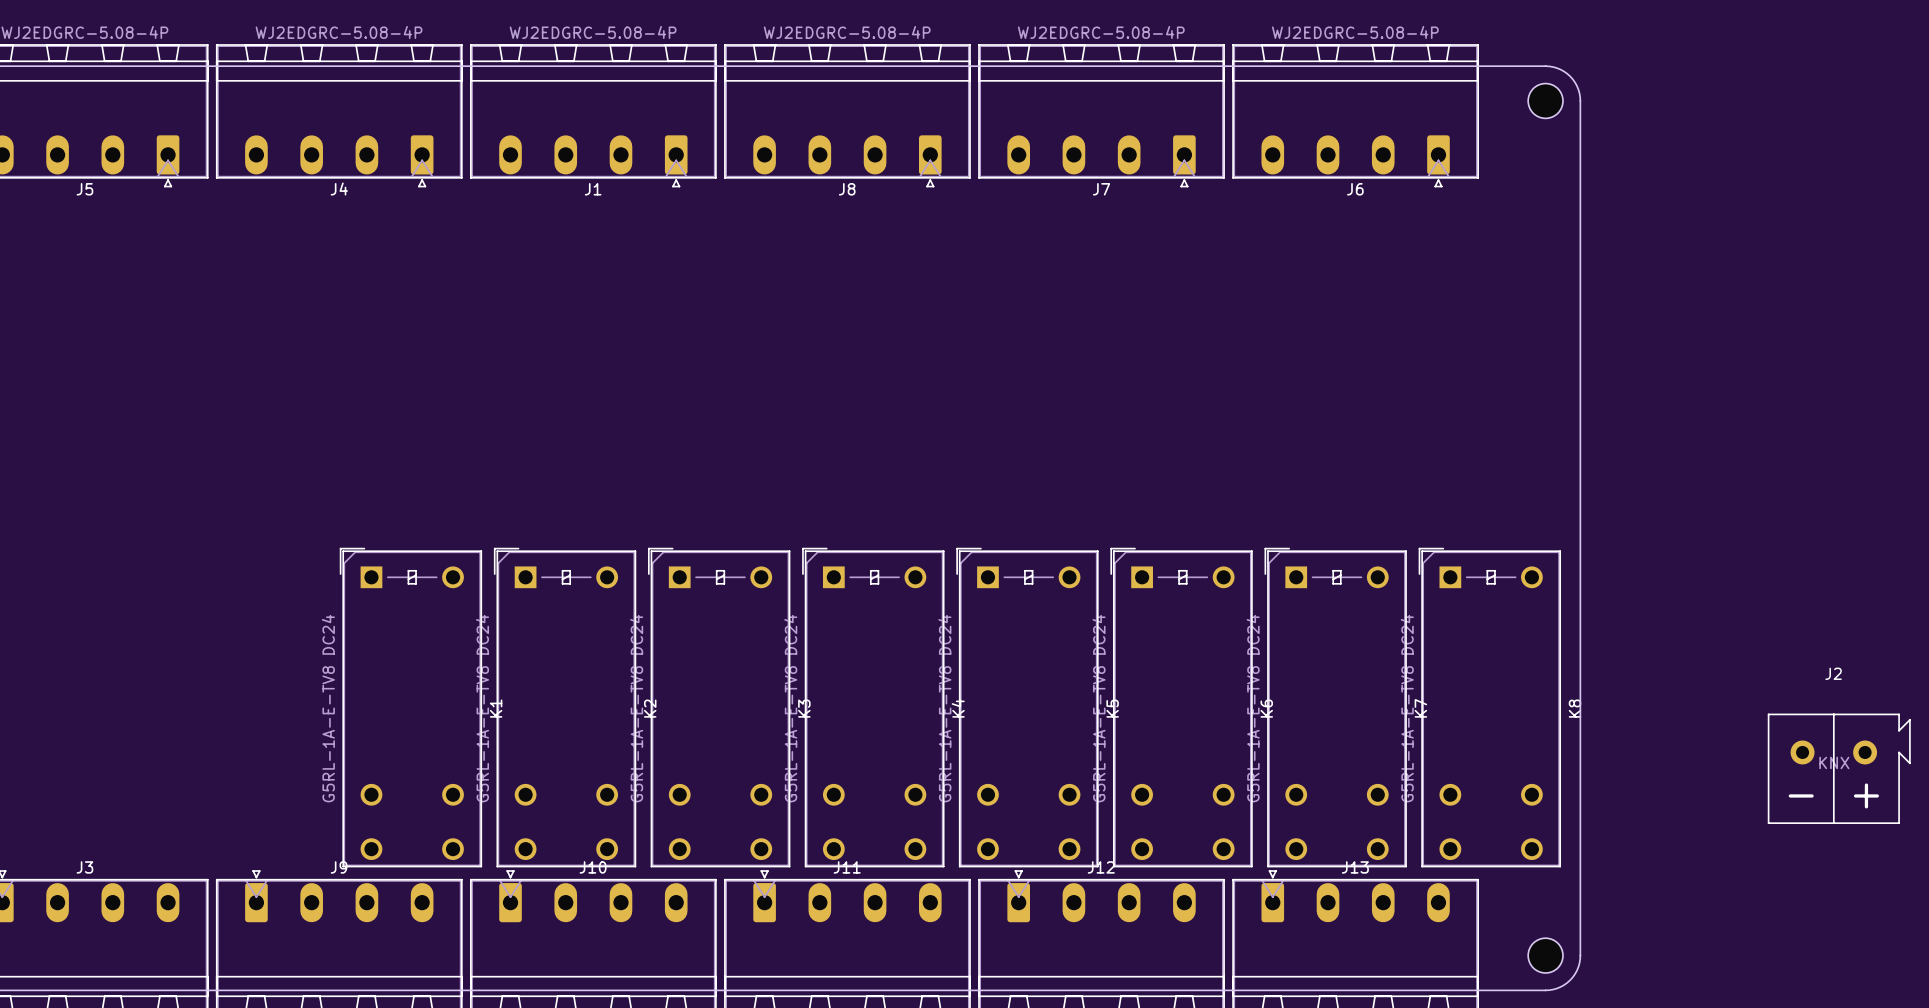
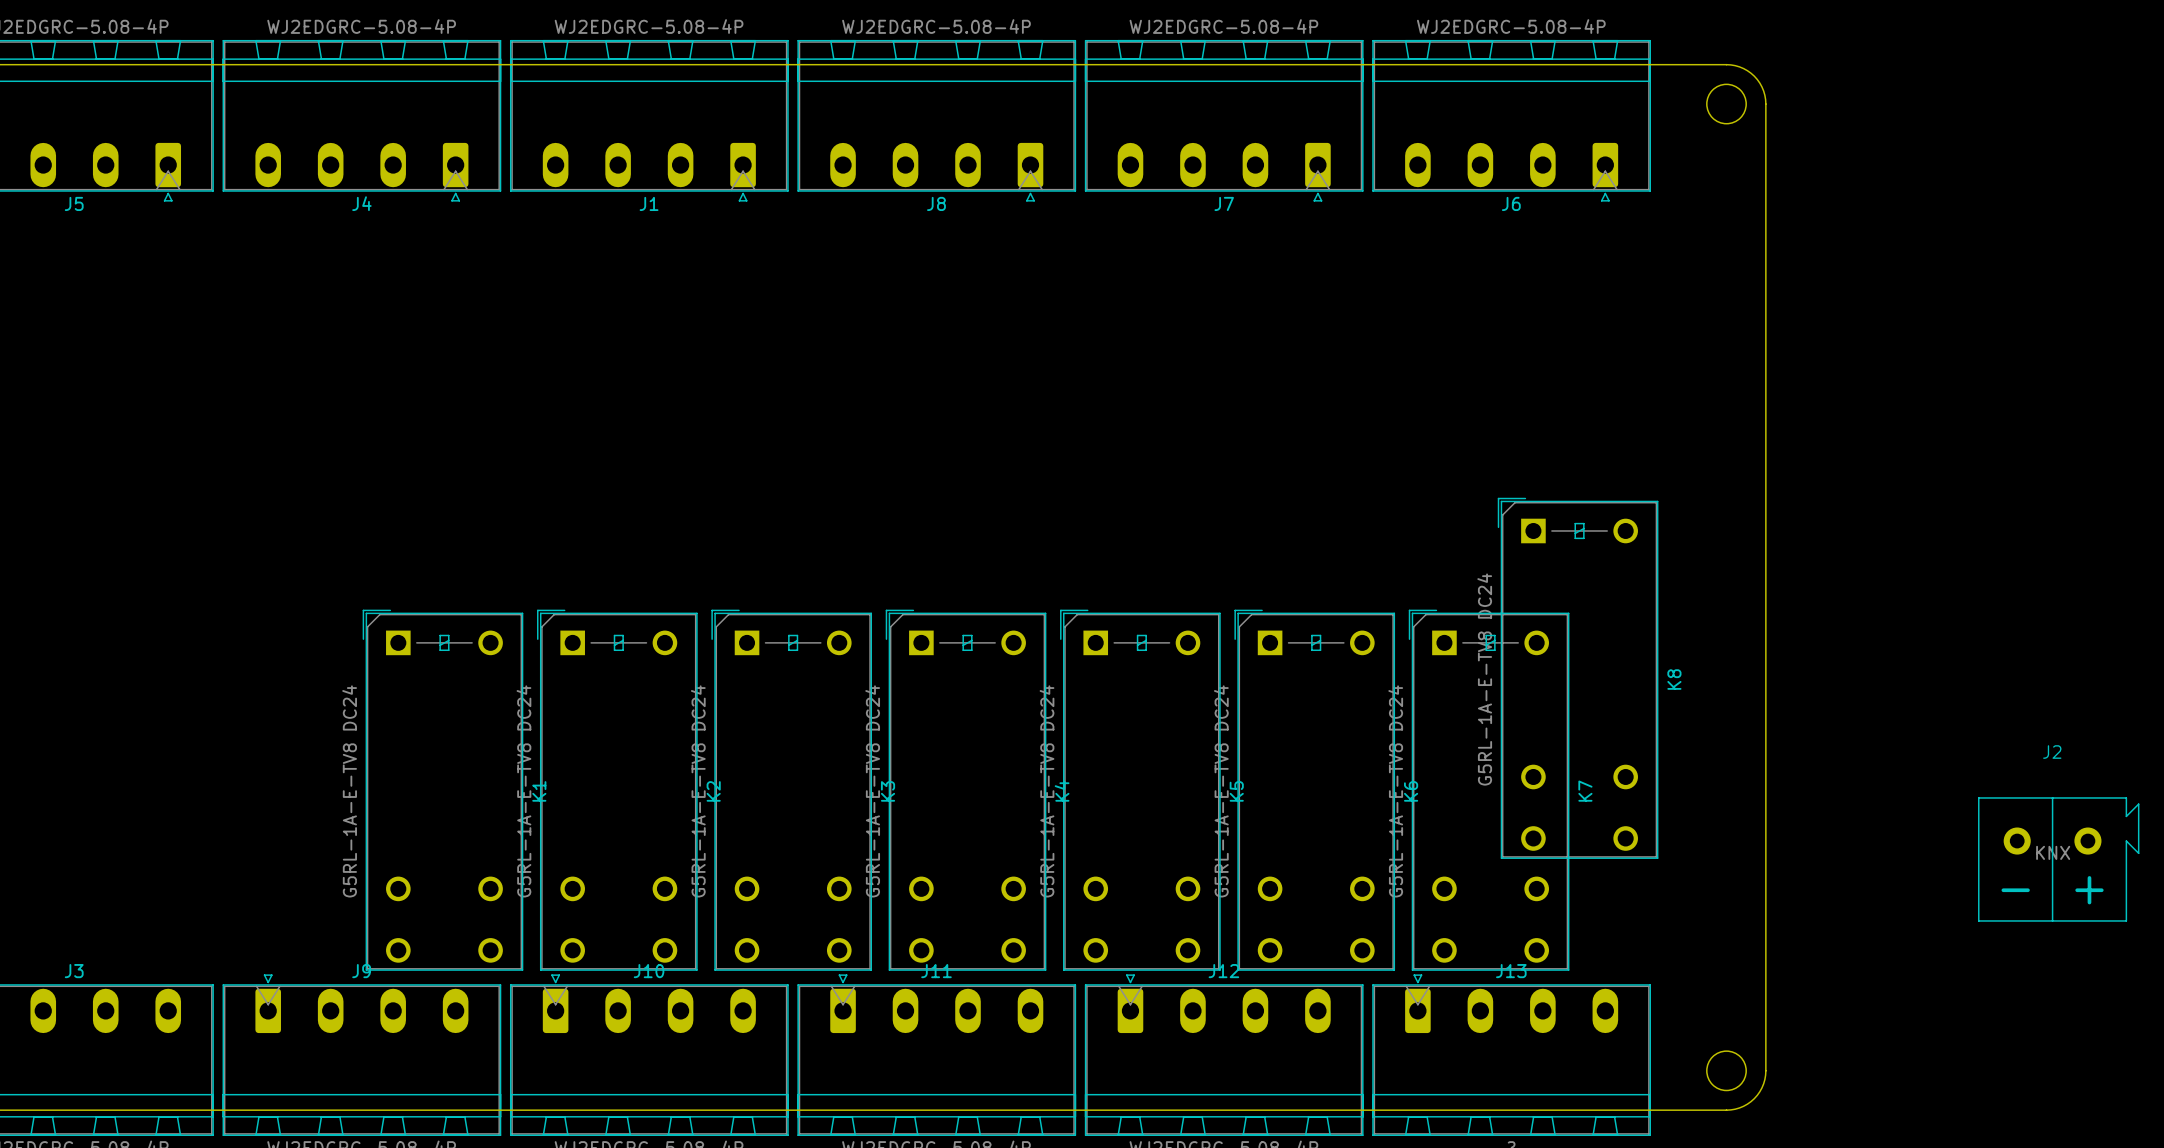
K8 position: (1489, 707) -> (1578, 678)

